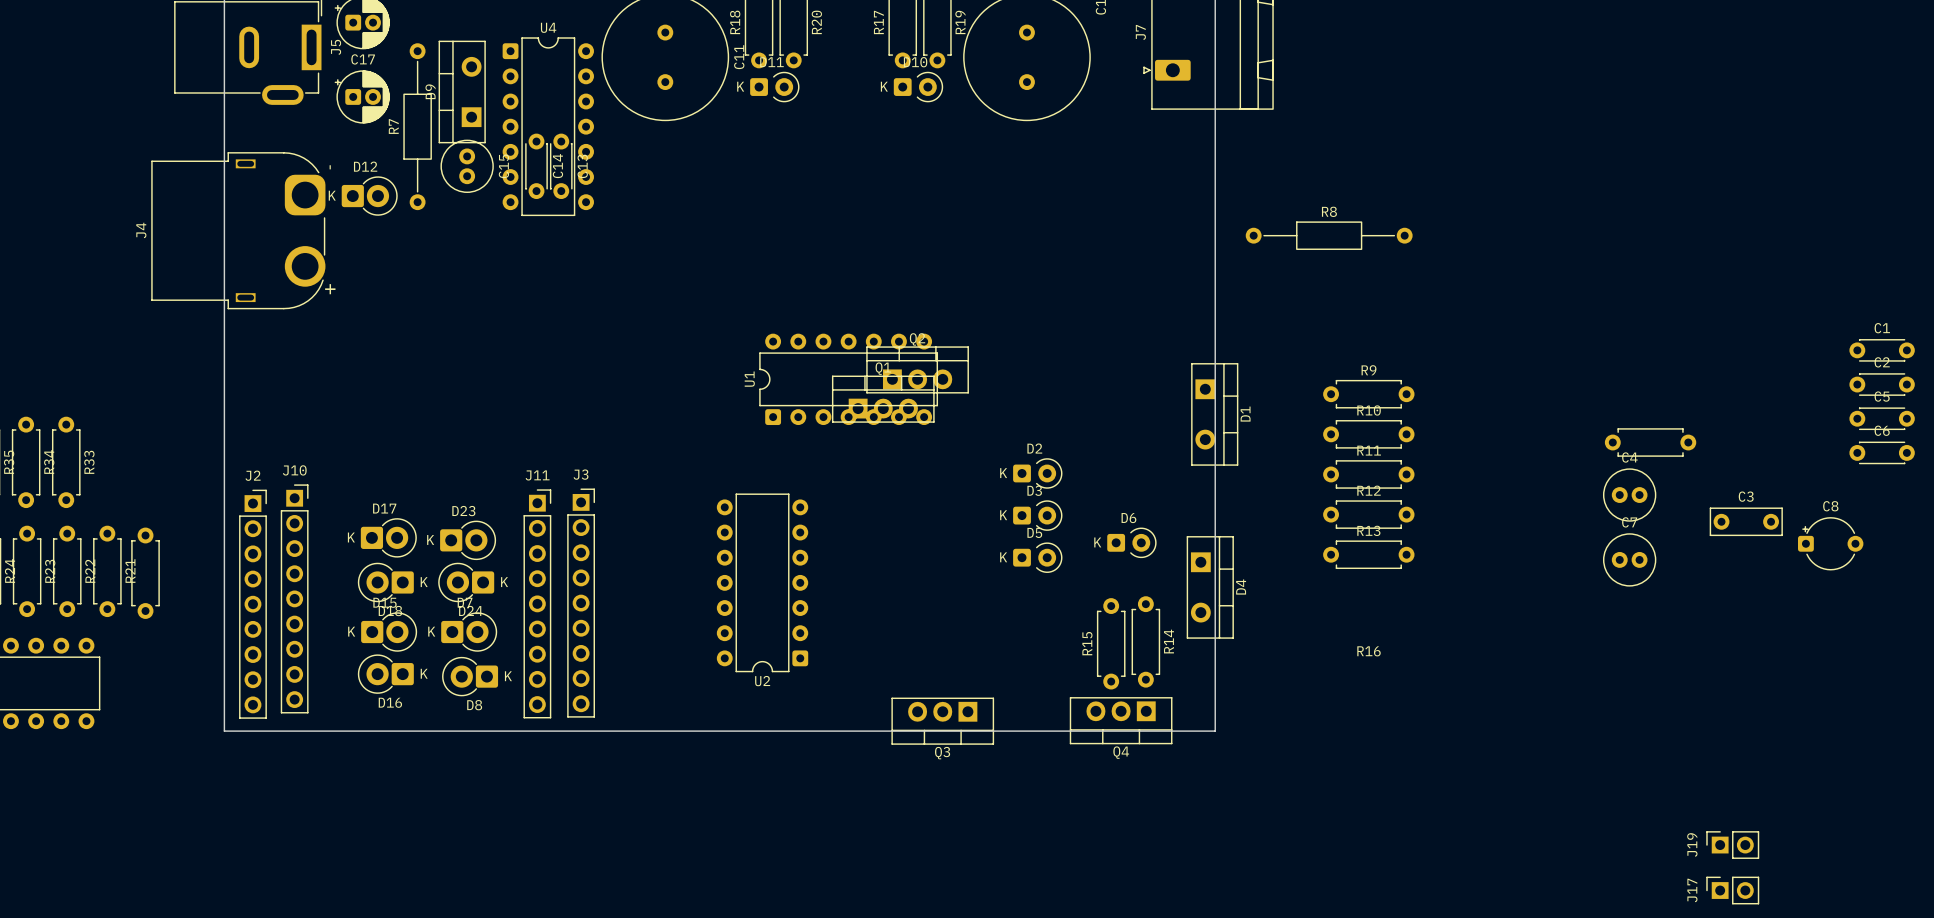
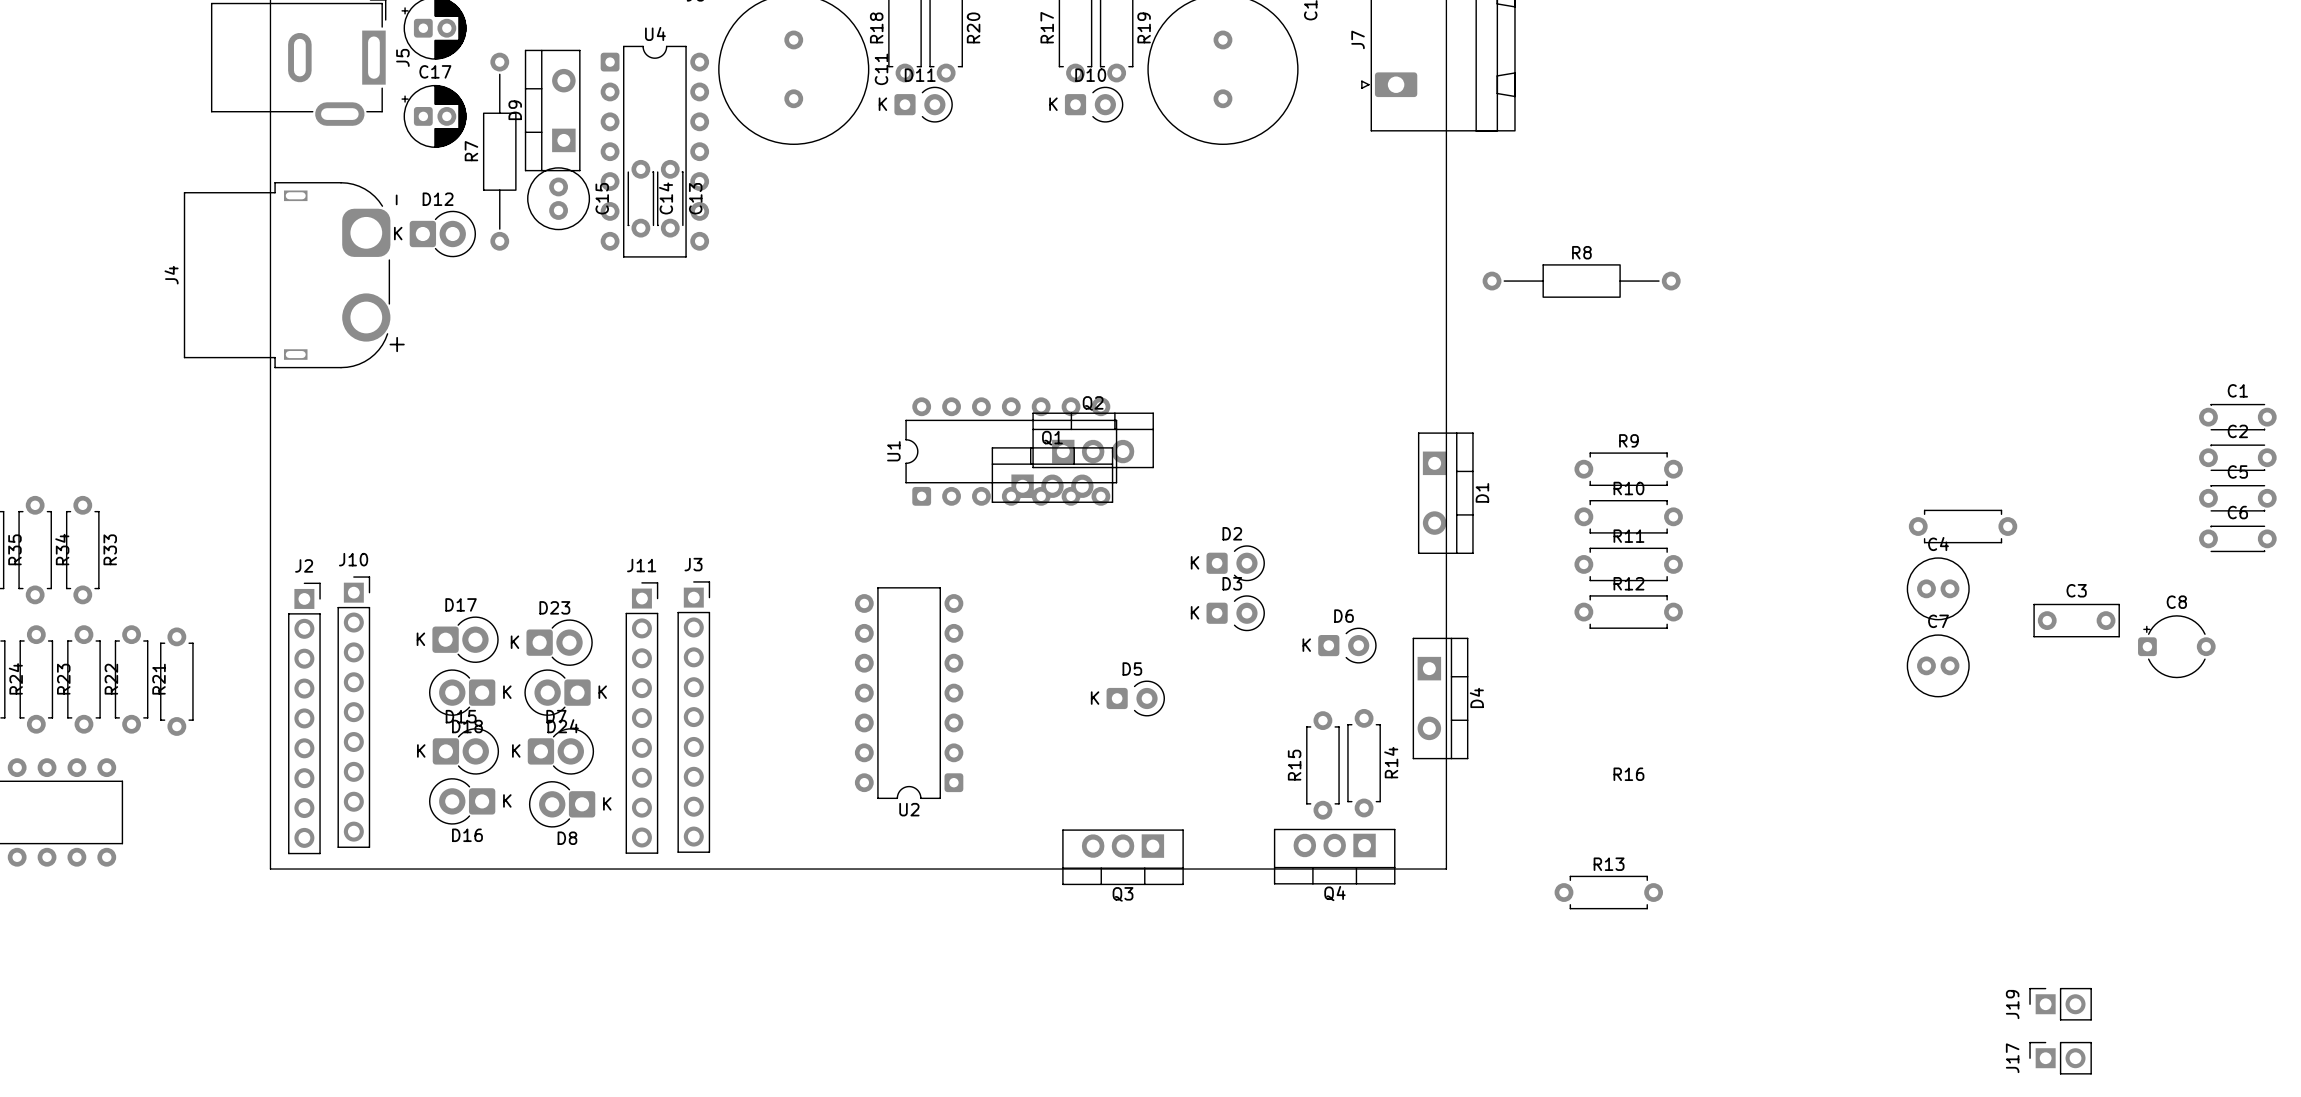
R13 position: (1368, 554) -> (1608, 892)
D5 position: (1037, 557) -> (1135, 698)

